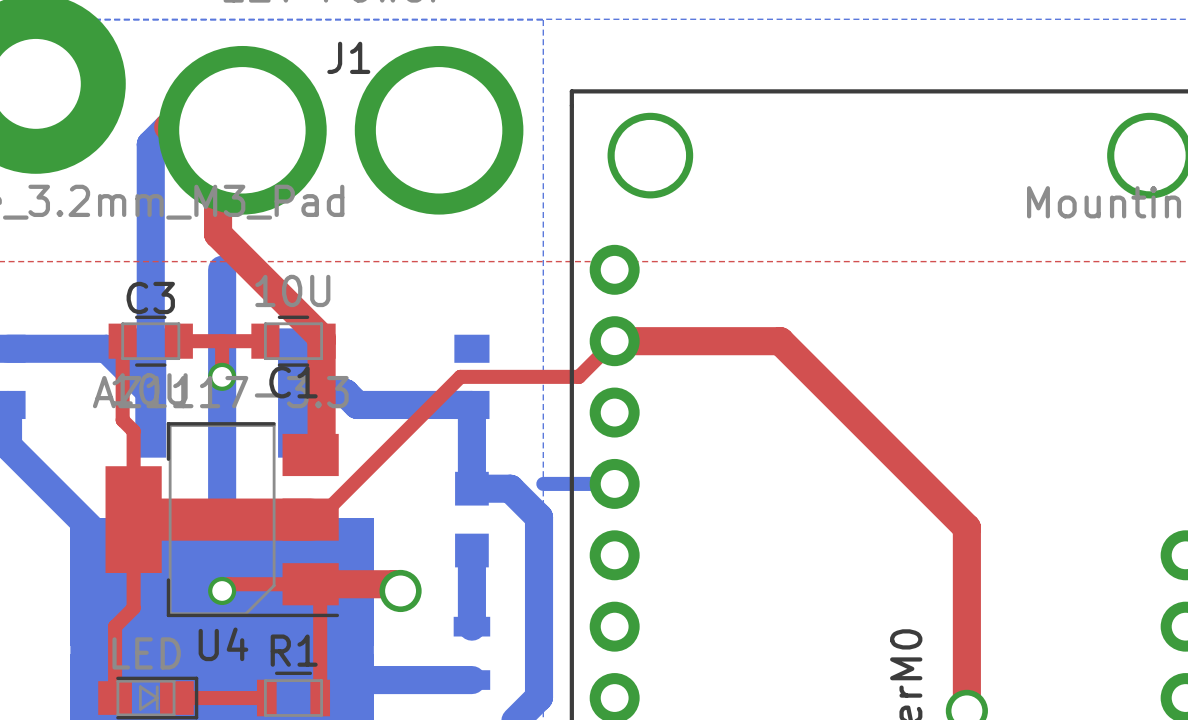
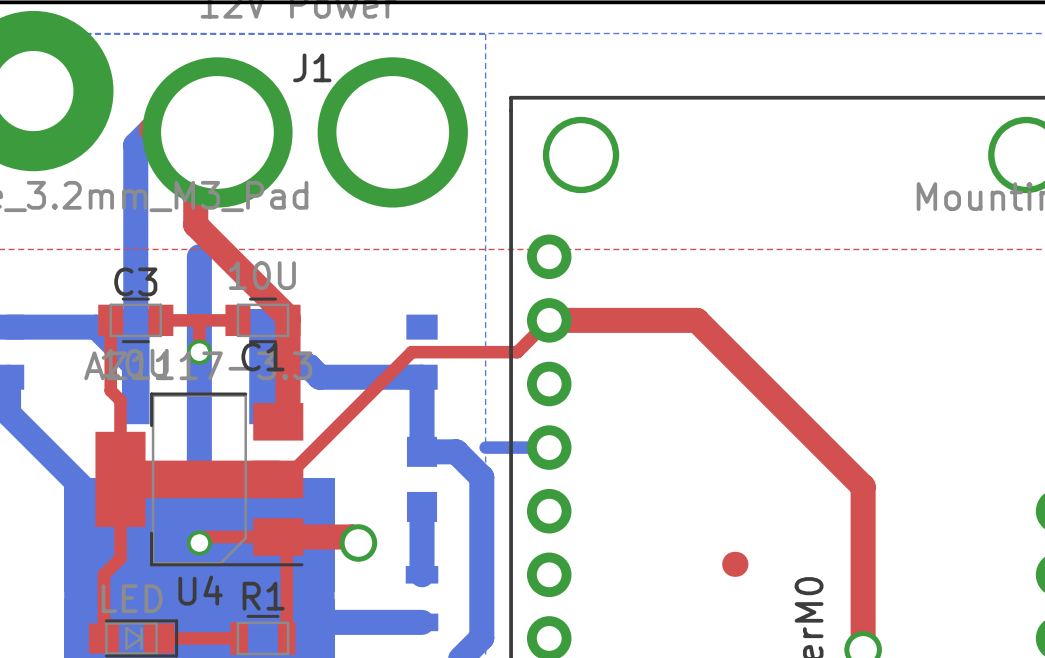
top track: none -> (734, 564) (735, 564)

